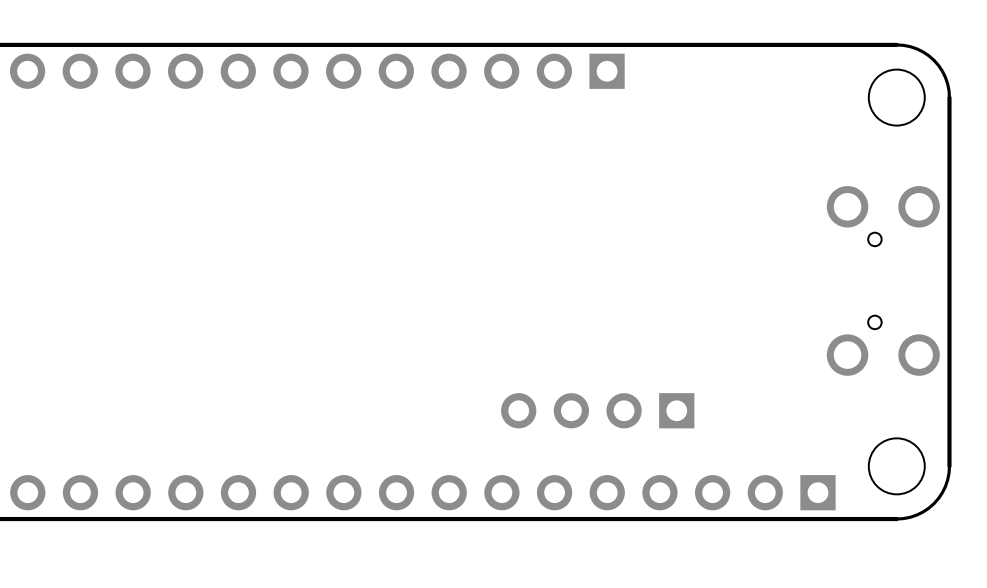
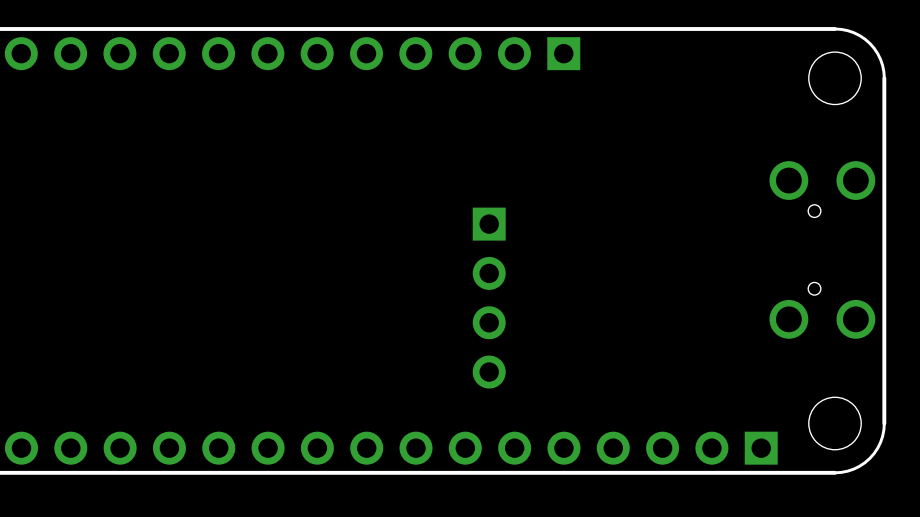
part rotation: 0° (597, 410) -> 90° counterclockwise (489, 298)

